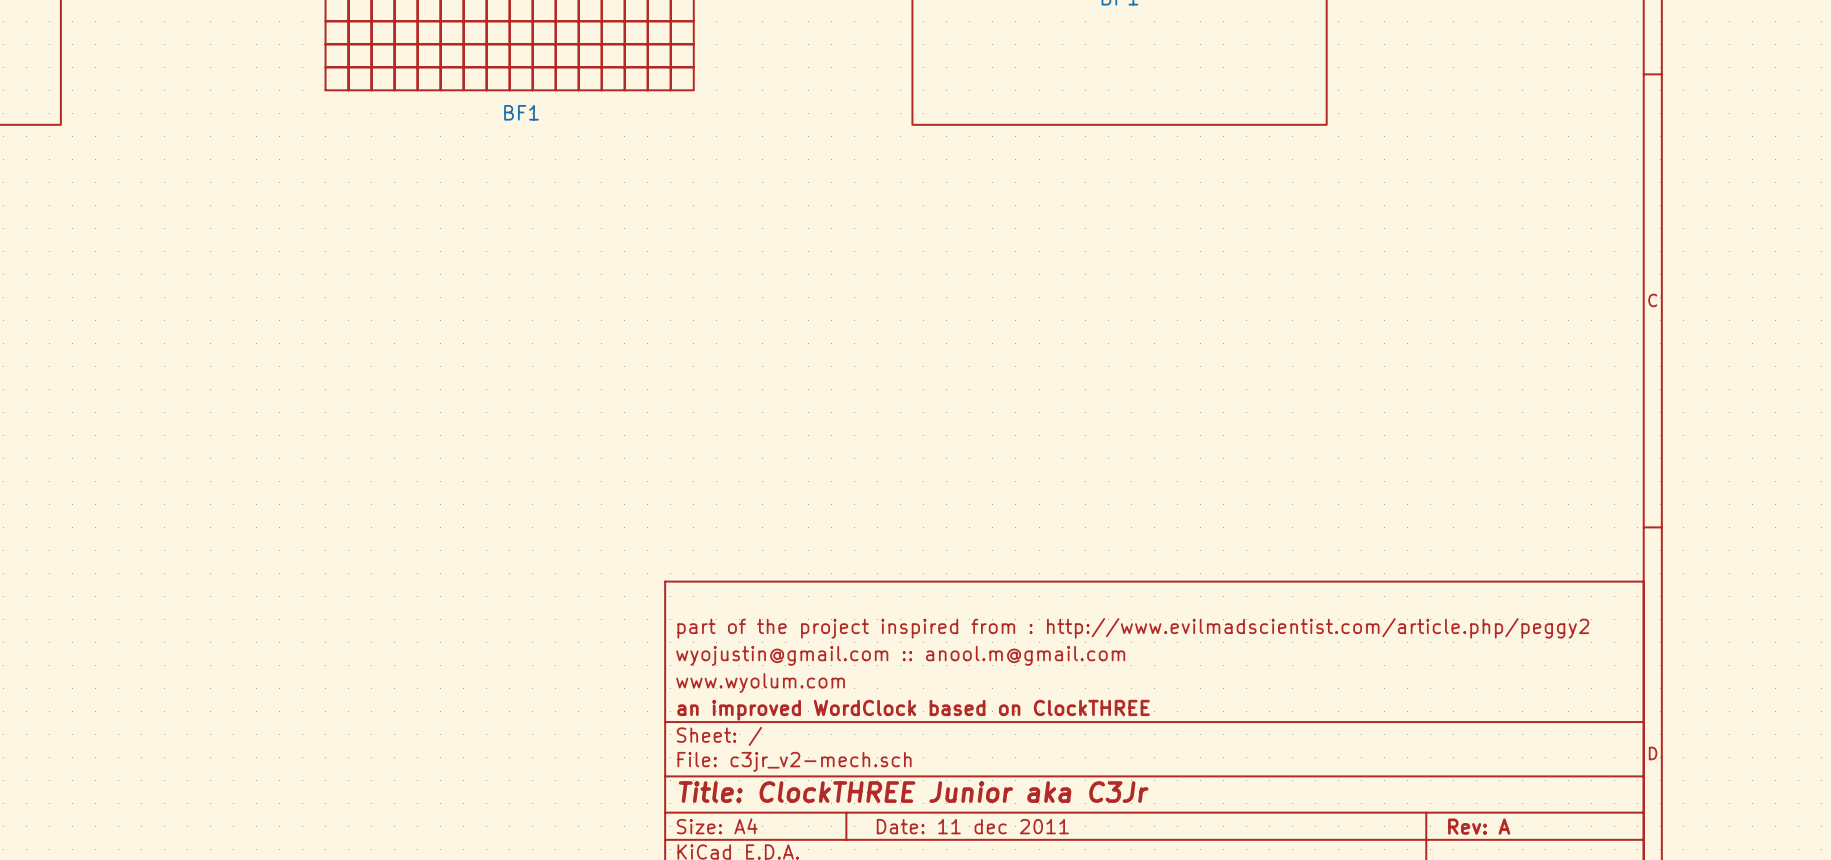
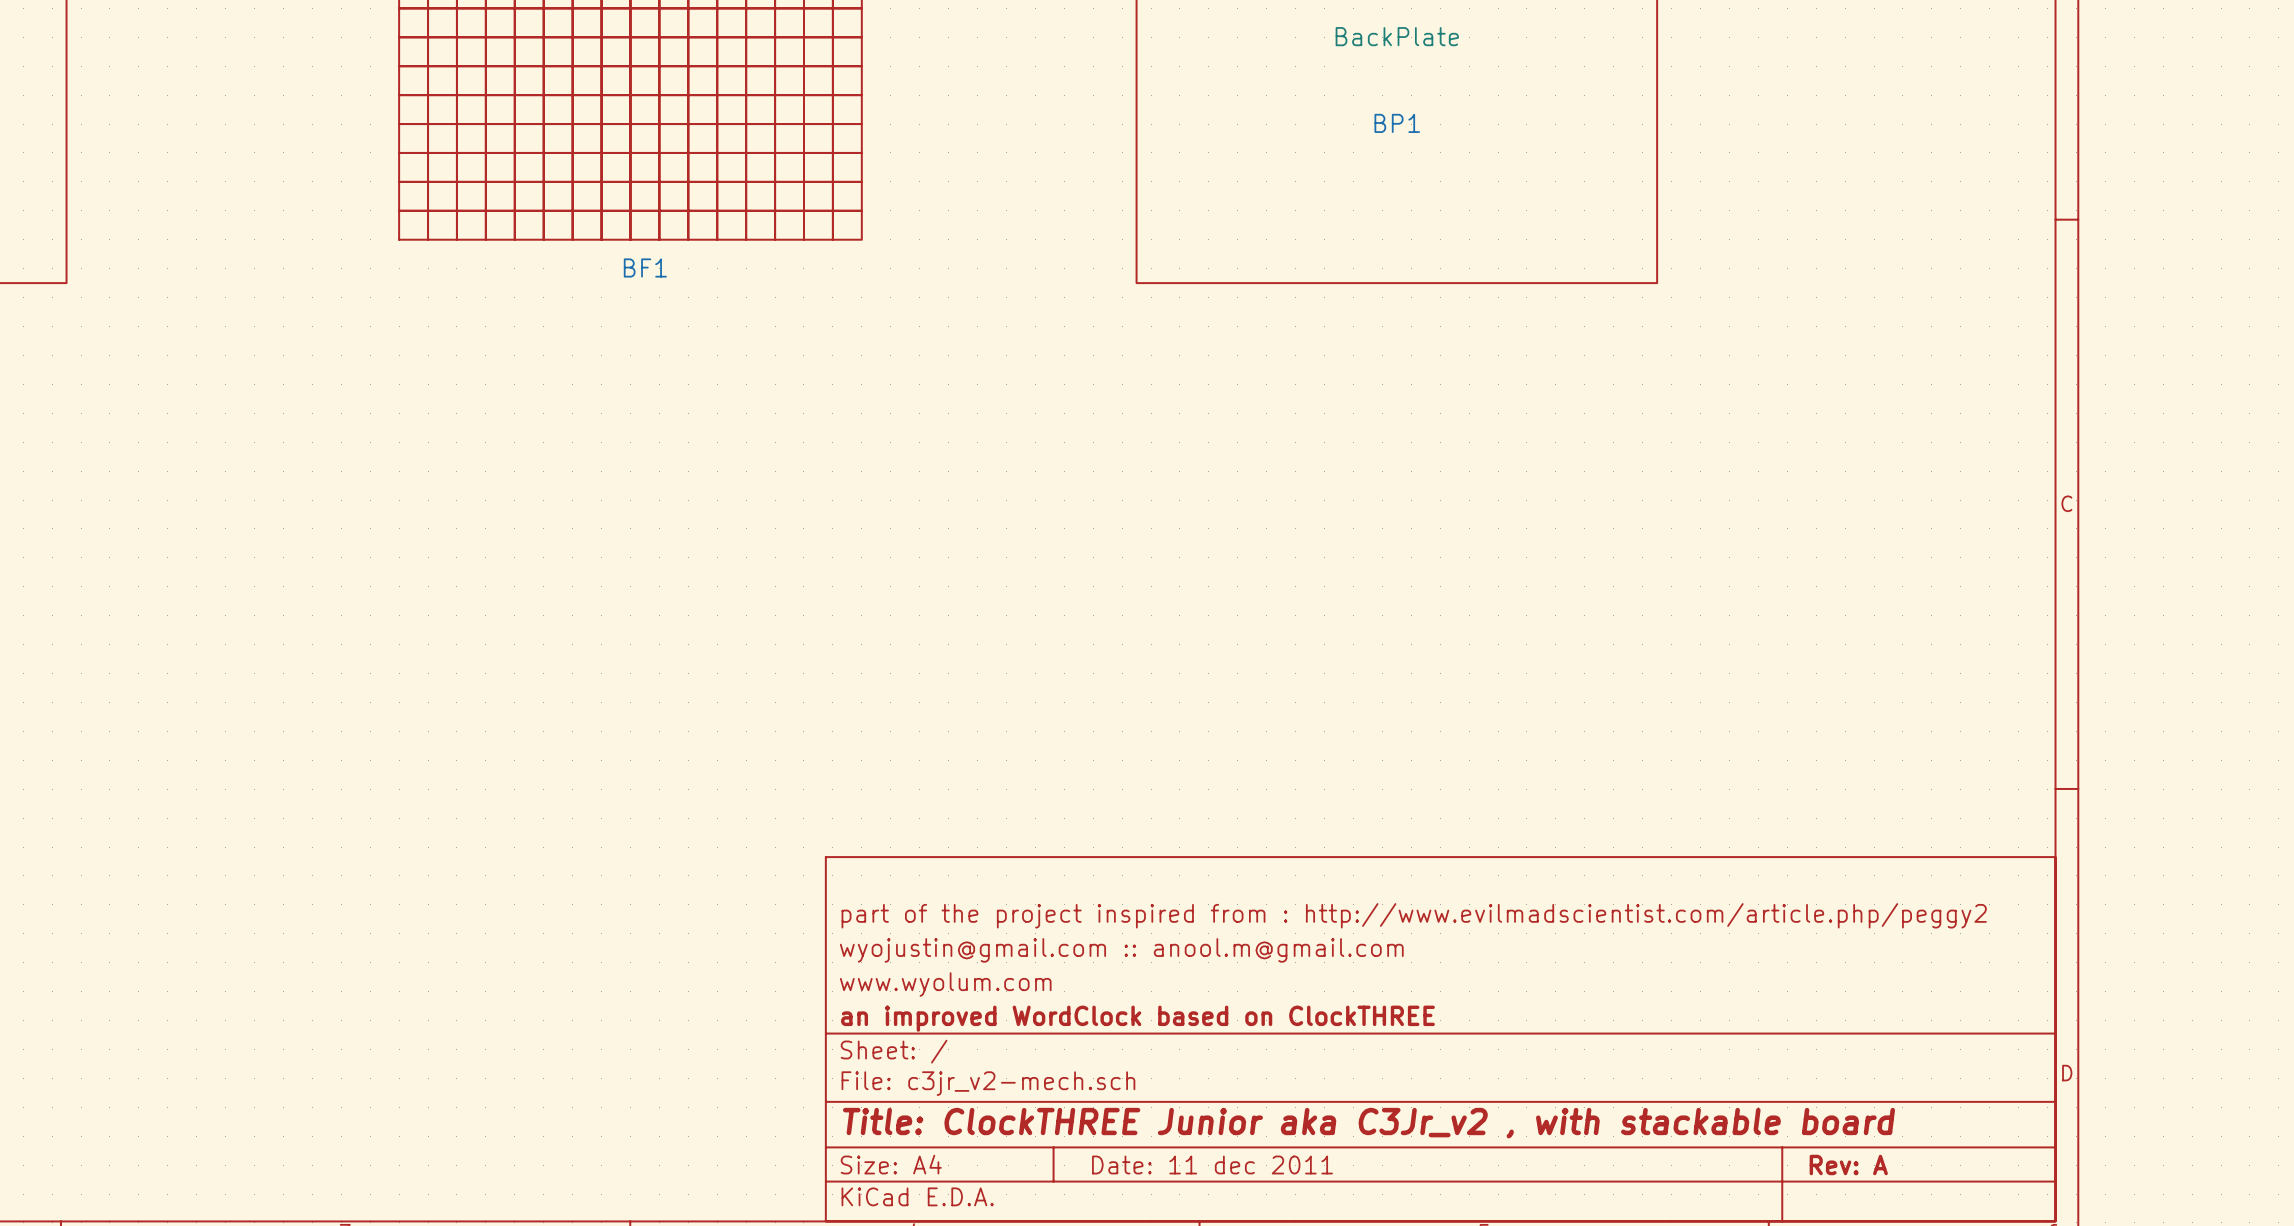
title block: Title: ClockTHREE Junior aka C3Jr (913, 792) -> Title: ClockTHREE Junior aka C3Jr_v2 , with stackable board (1368, 1123)

